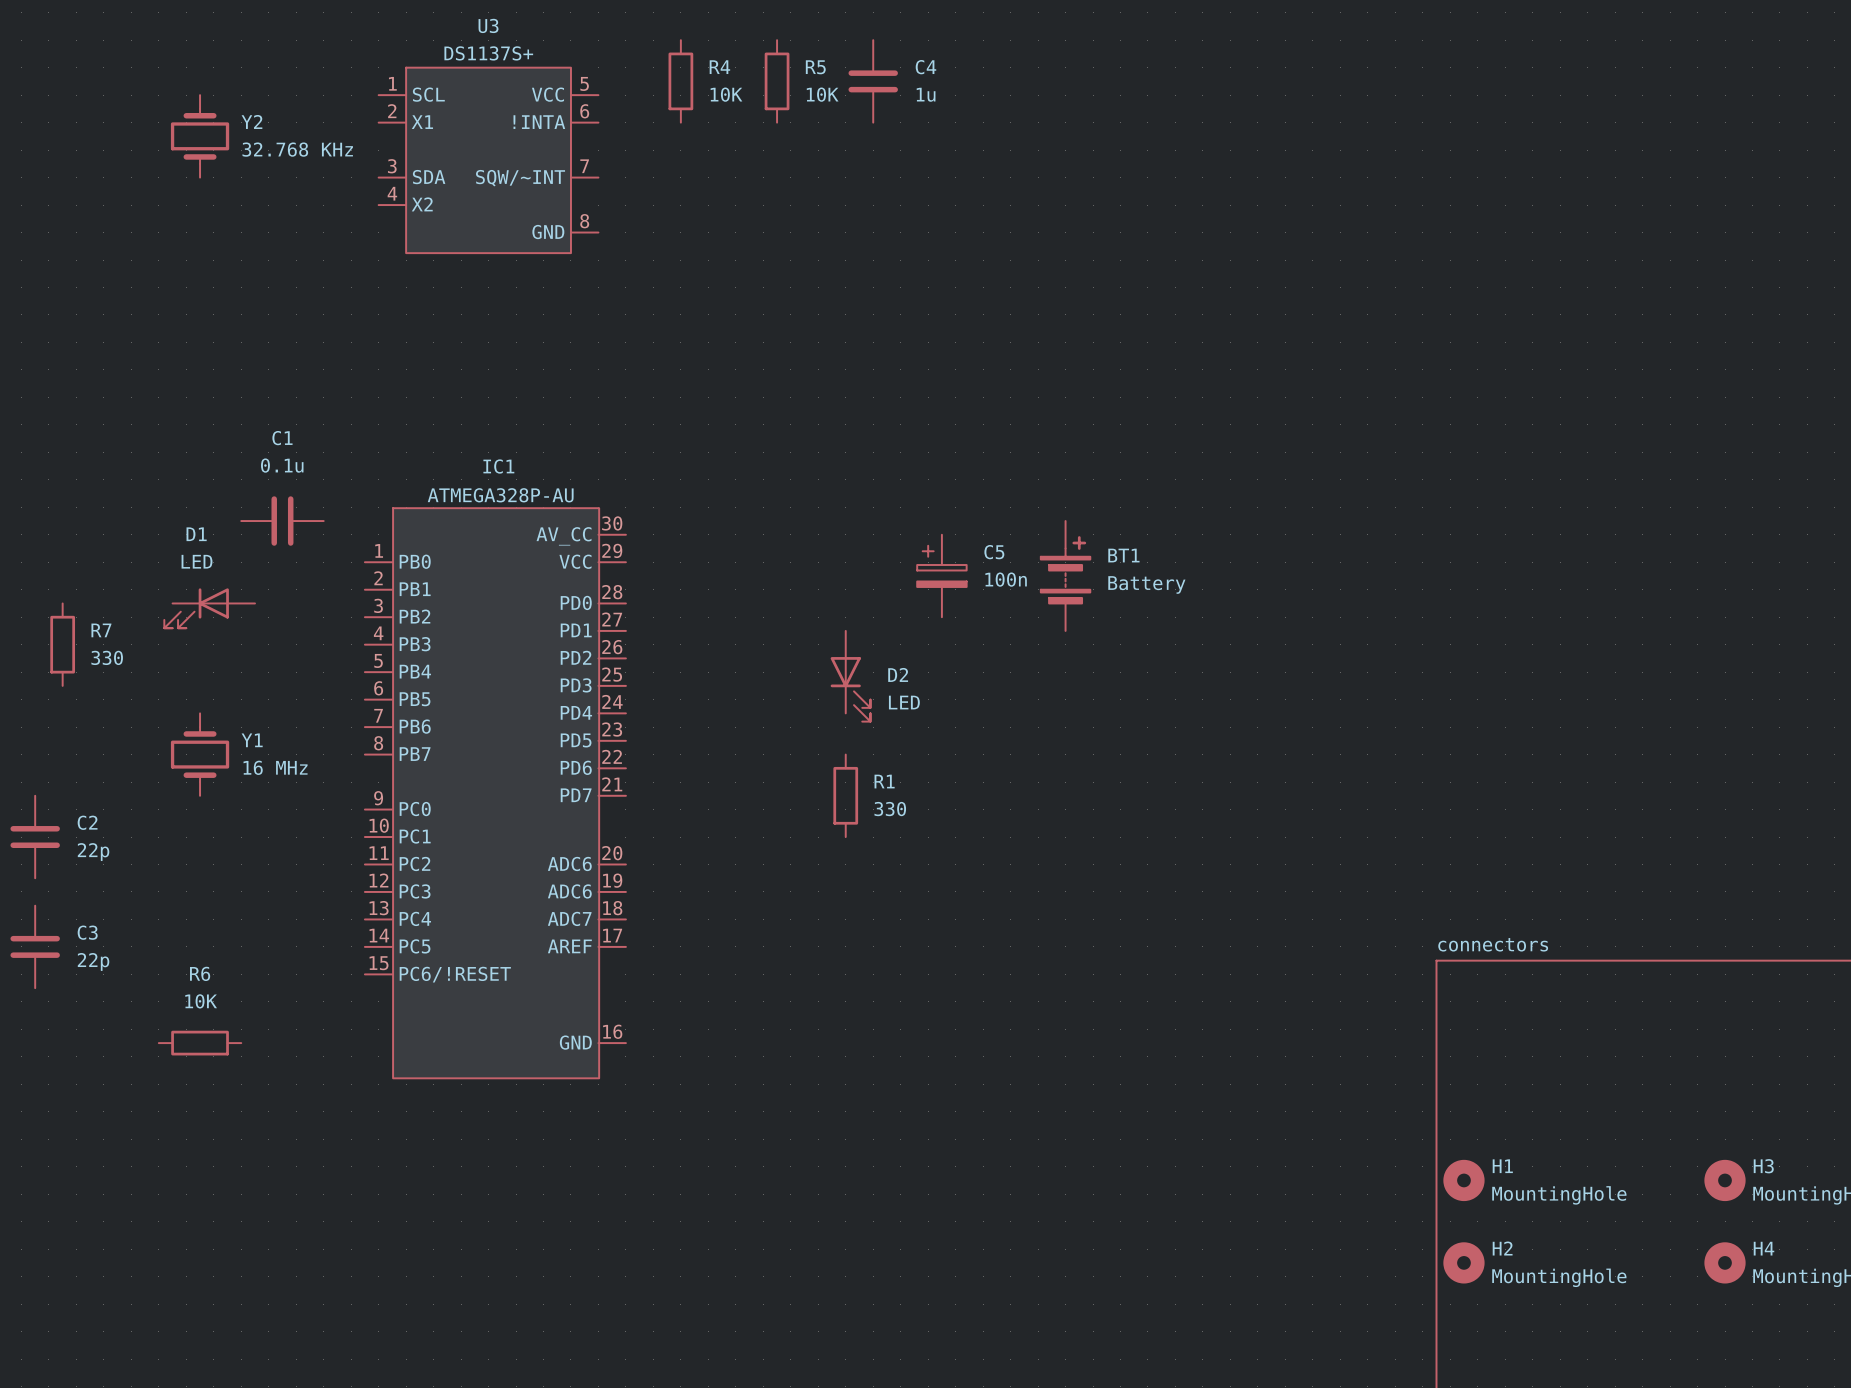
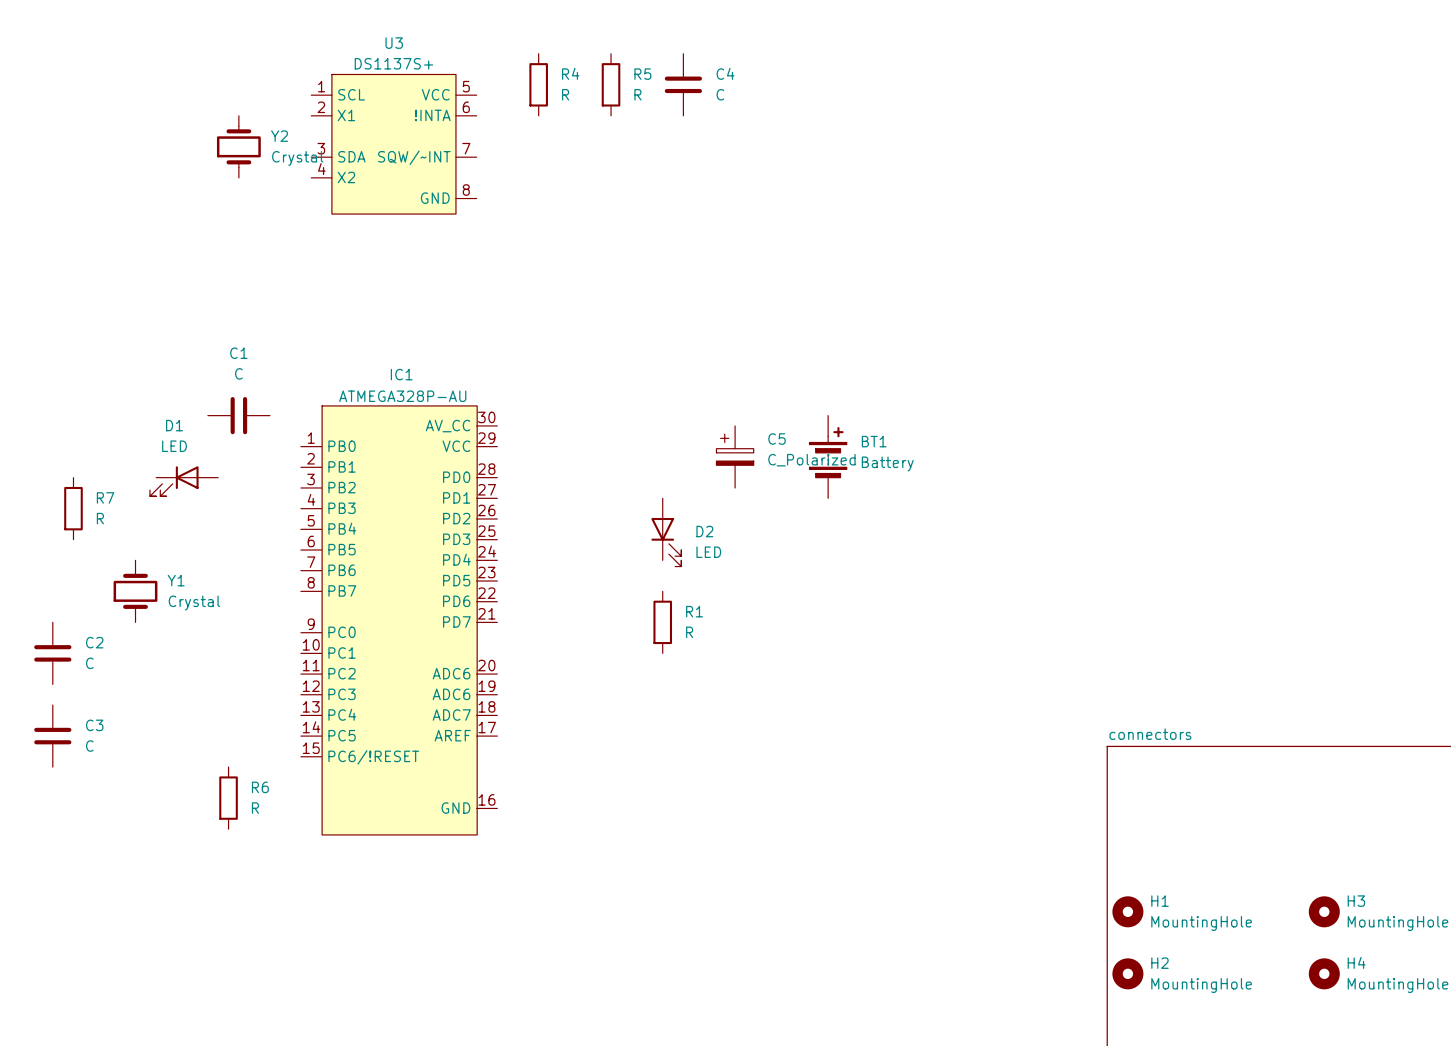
R4 value: 10K (726, 94) -> R (565, 94)
R5 value: 10K (822, 94) -> R (637, 94)
C4 value: 1u (926, 94) -> C (720, 94)
Y2 position: (200, 136) -> (238, 146)
Y2 value: 32.768 KHz (297, 149) -> Crystal (297, 158)
C1 value: 0.1u (282, 465) -> C (238, 373)
C5 value: 100n (1006, 579) -> C_Polarized (811, 460)
R7 value: 330 (107, 657) -> R (100, 518)
Y1 position: (200, 754) -> (135, 591)
Y1 value: 16 MHz (275, 767) -> Crystal (194, 603)
R1 value: 330 (890, 809) -> R (689, 632)
C2 value: 22p (93, 852) -> C (89, 663)
C3 value: 22p (93, 961) -> C (89, 746)
R6 name position: R6 (200, 973) -> R6 (260, 787)
R6 value: 10K (201, 1001) -> R (255, 808)
R6 rotation: 0° (200, 1043) -> 90° clockwise (228, 798)
R6 position: (200, 1043) -> (228, 798)

